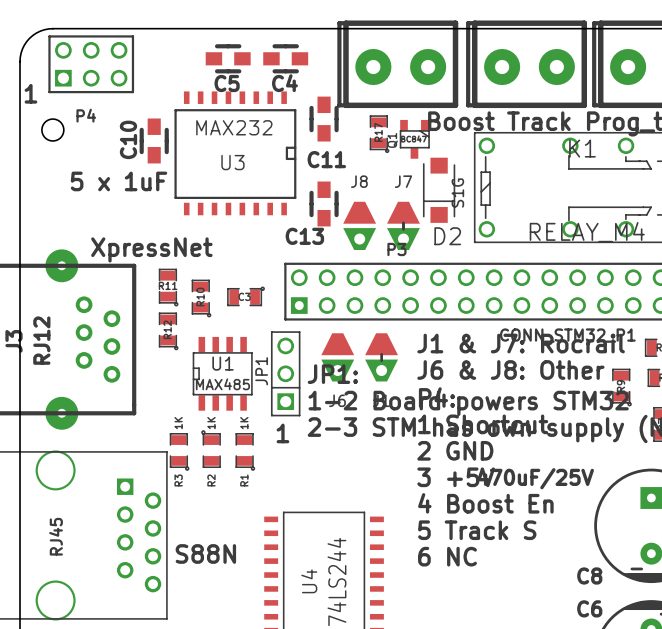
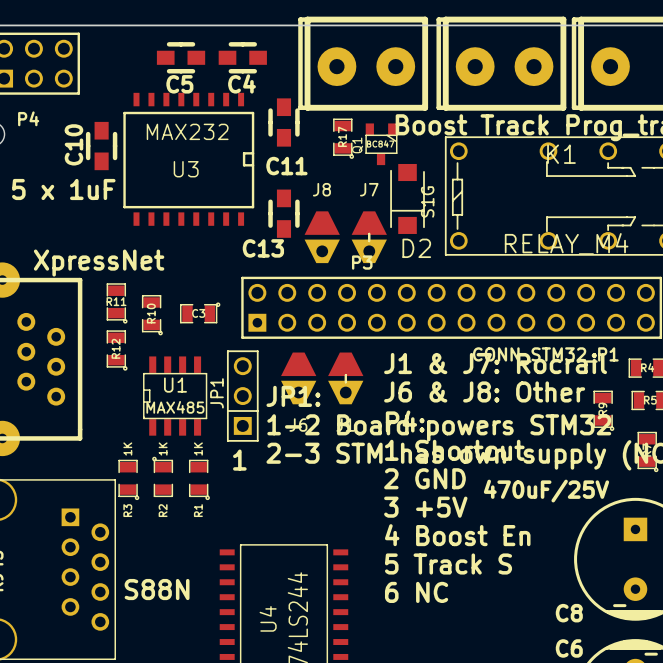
C8 value position: 470uF/25V (535, 478) -> 470uF/25V (546, 491)

